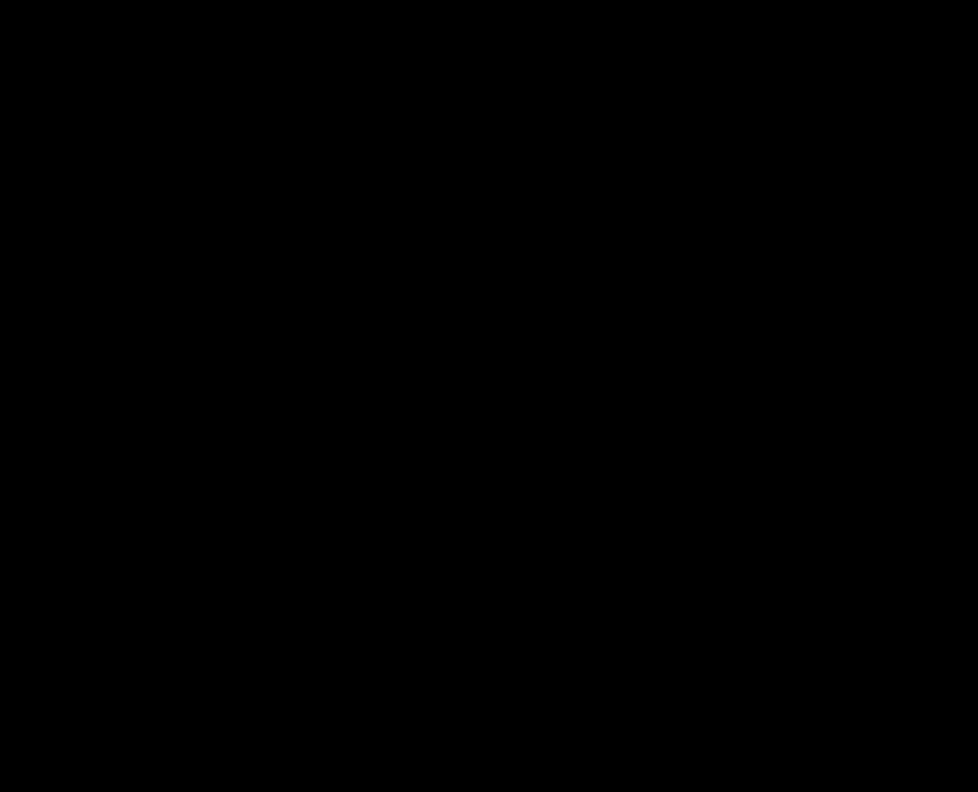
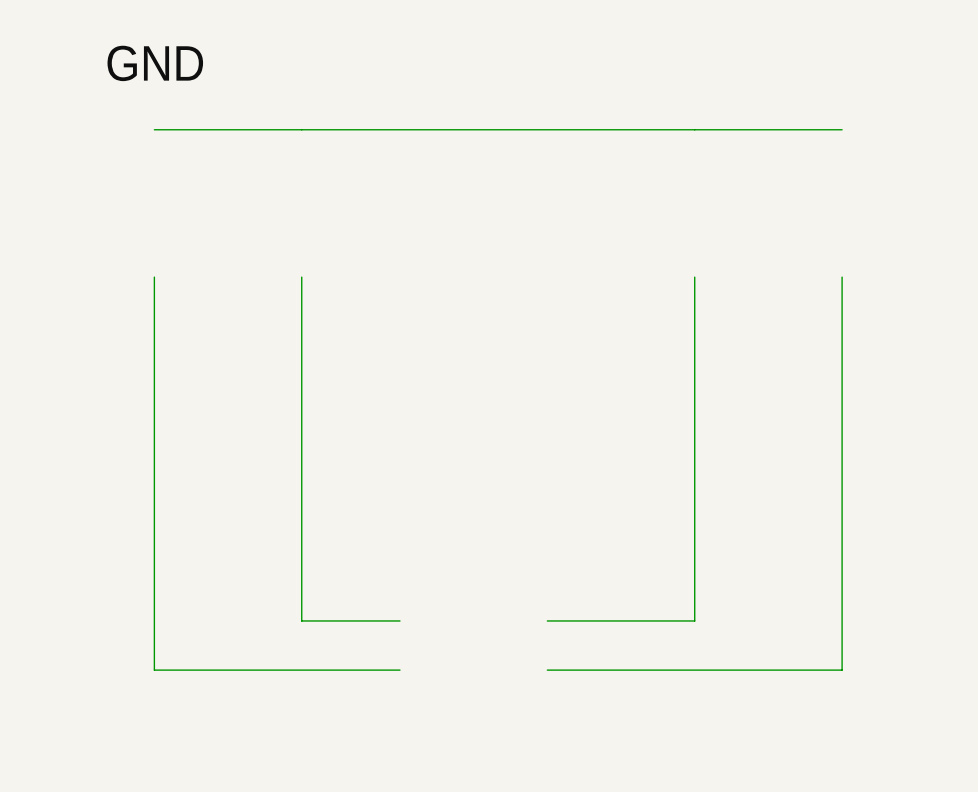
label: none -> GND (155, 63)
wire: none -> (154, 129) (842, 129)
wire: none -> (154, 277) (154, 670) (399, 670)
wire: none -> (301, 277) (301, 620) (399, 620)
wire: none -> (694, 277) (694, 620) (547, 620)
wire: none -> (842, 277) (842, 670) (547, 670)

